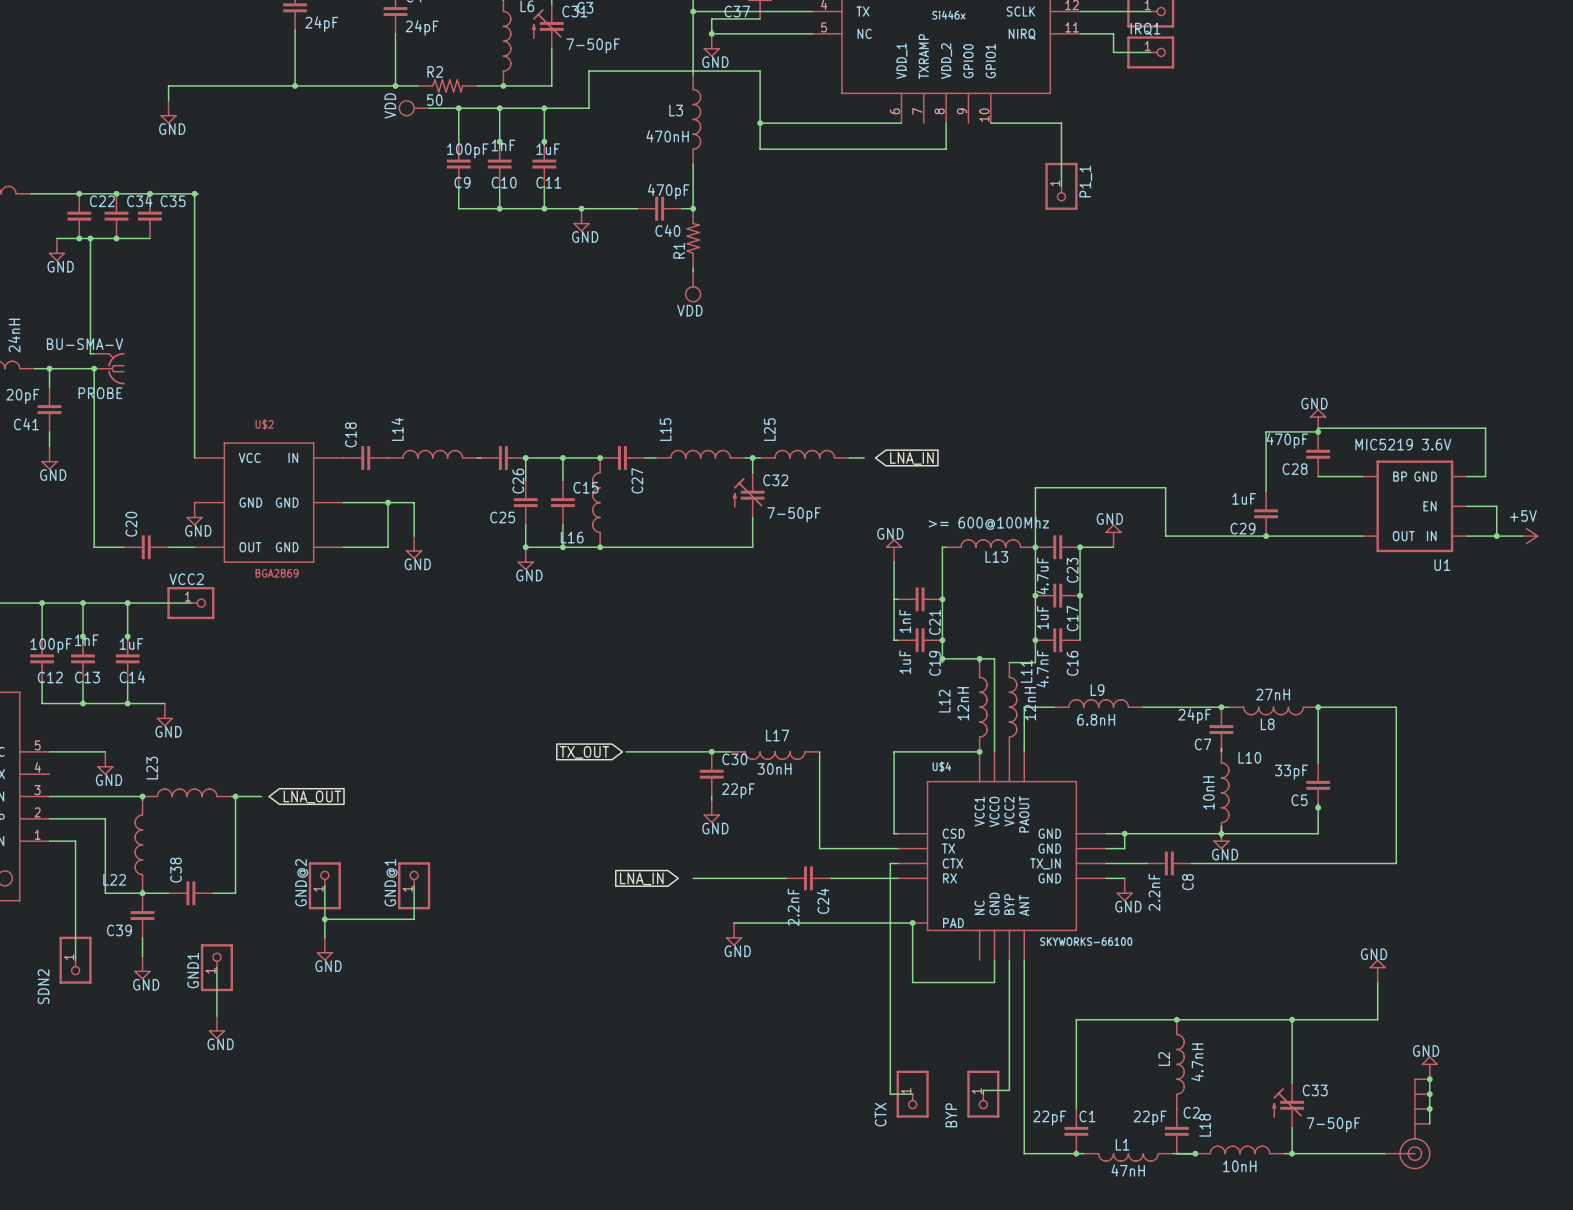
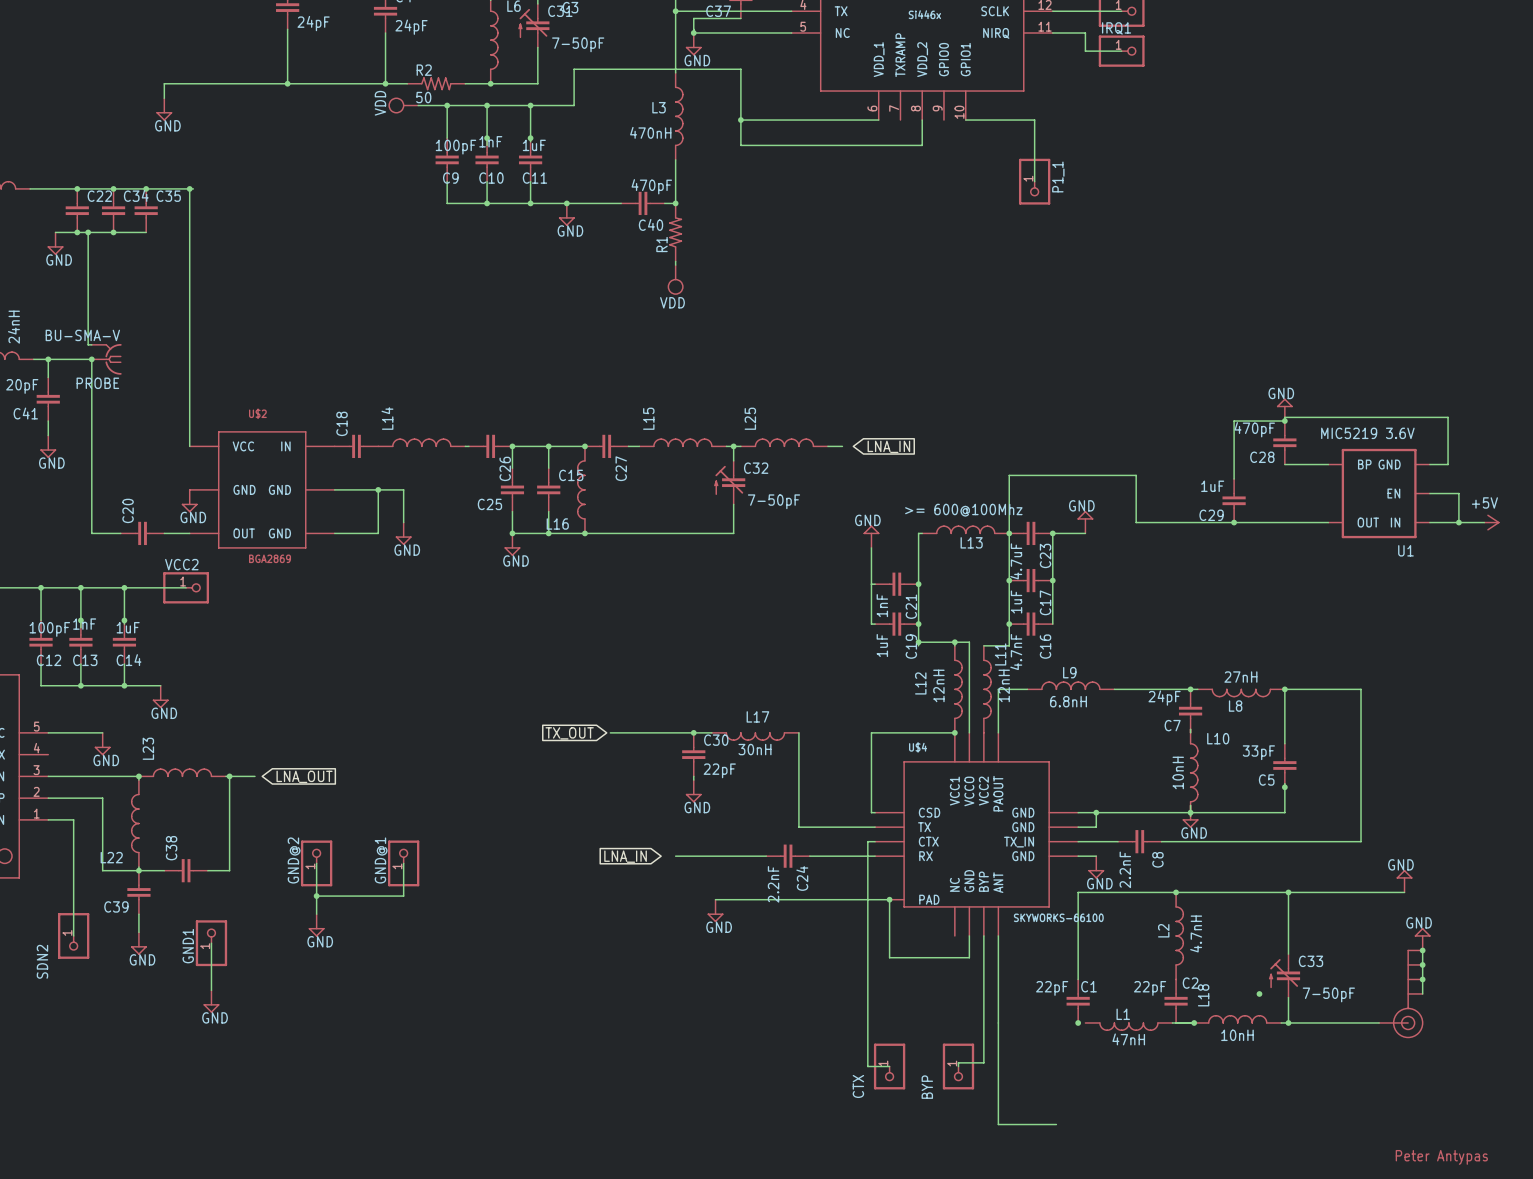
power symbol: none -> GND (1404, 881)
junction: none -> (1176, 892)
junction: none -> (1288, 892)
wire: none -> (1404, 892) (1078, 892) (1078, 979)
power symbol: none -> GND (1422, 939)
power symbol: GND (1377, 971) -> none
junction: none -> (1422, 950)
wire: (1377, 982) (1377, 1019) (1076, 1019) (1076, 1109) -> none
junction: none -> (1422, 964)
junction: none -> (1422, 979)
junction: (1176, 1019) -> none
wire: (1292, 1019) (1292, 1082) -> (1288, 892) (1288, 954)
junction: none -> (1078, 1022)
junction: none -> (1194, 1022)
junction: none -> (1288, 1022)
L2 position: (1180, 1064) -> (1179, 935)
power symbol: GND (1429, 1067) -> none
wire: (1429, 1079) (1429, 1123) -> (1422, 950) (1422, 993)
junction: (1429, 1079) -> none
junction: (1429, 1094) -> none
C33 position: (1288, 1105) -> (1284, 975)
junction: (1429, 1109) -> none
part position: (1407, 1123) -> (1401, 993)
wire: (1292, 1127) (1292, 1153) -> (1288, 997) (1288, 1022)
C1 position: (1076, 1131) -> (1078, 1001)
C2 position: (1176, 1131) -> (1176, 1001)
L18 position: (1240, 1149) -> (1237, 1019)
junction: (1076, 1153) -> none
wire: (1173, 1153) (1195, 1153) -> (1172, 1022) (1194, 1022)
junction: (1195, 1153) -> none
wire: (1284, 1153) (1385, 1153) -> (1281, 1022) (1379, 1022)
junction: (1292, 1153) -> none
L1 position: (1128, 1157) -> (1128, 1026)
text: none -> Peter Antypas (1441, 1157)

